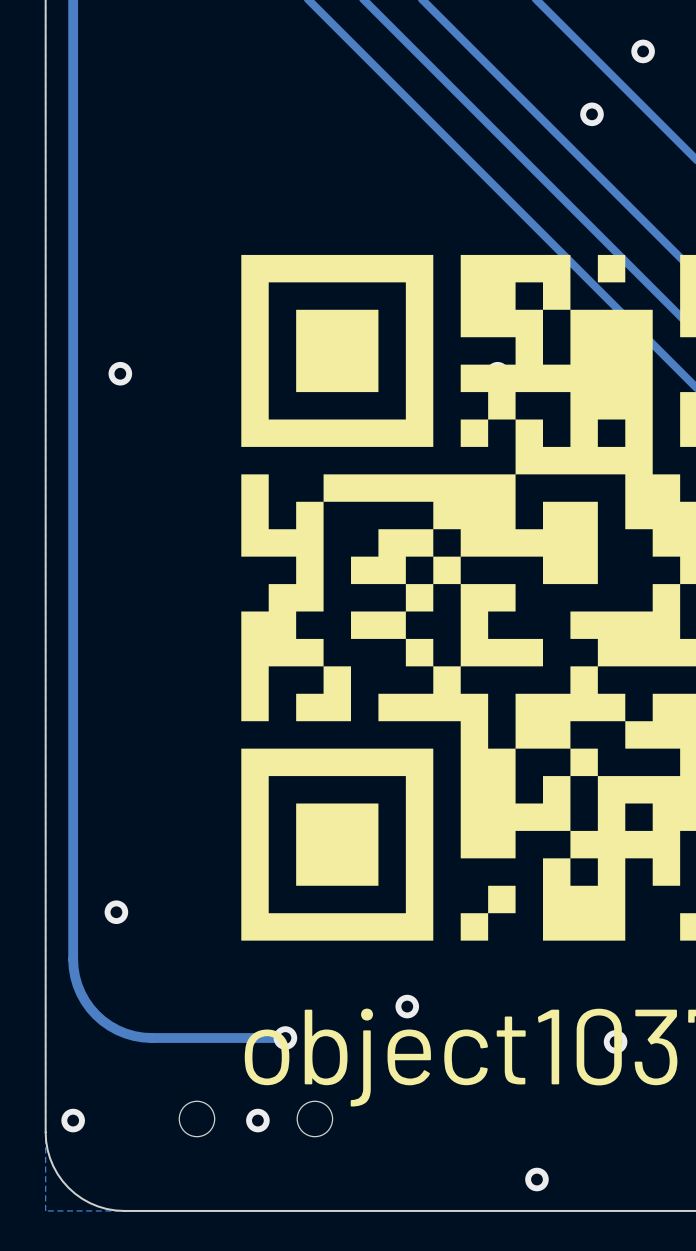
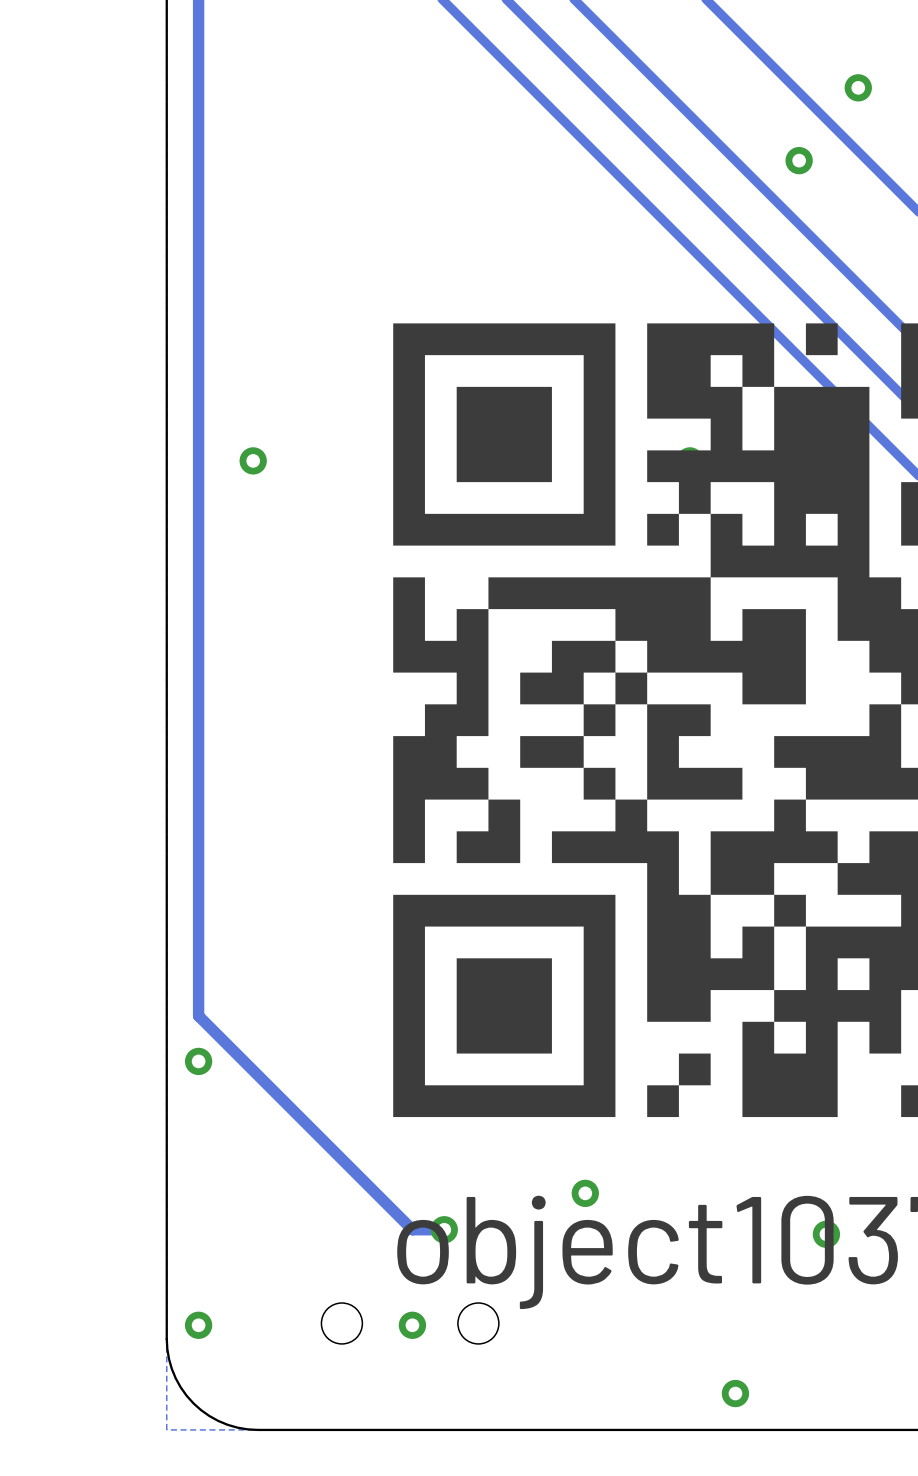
track: (73, 853) (73, 968) (80, 993) (96, 1014) (117, 1030) (142, 1037) (257, 1038) -> (198, 1015) (412, 1229)
via position: (116, 912) -> (198, 1061)

